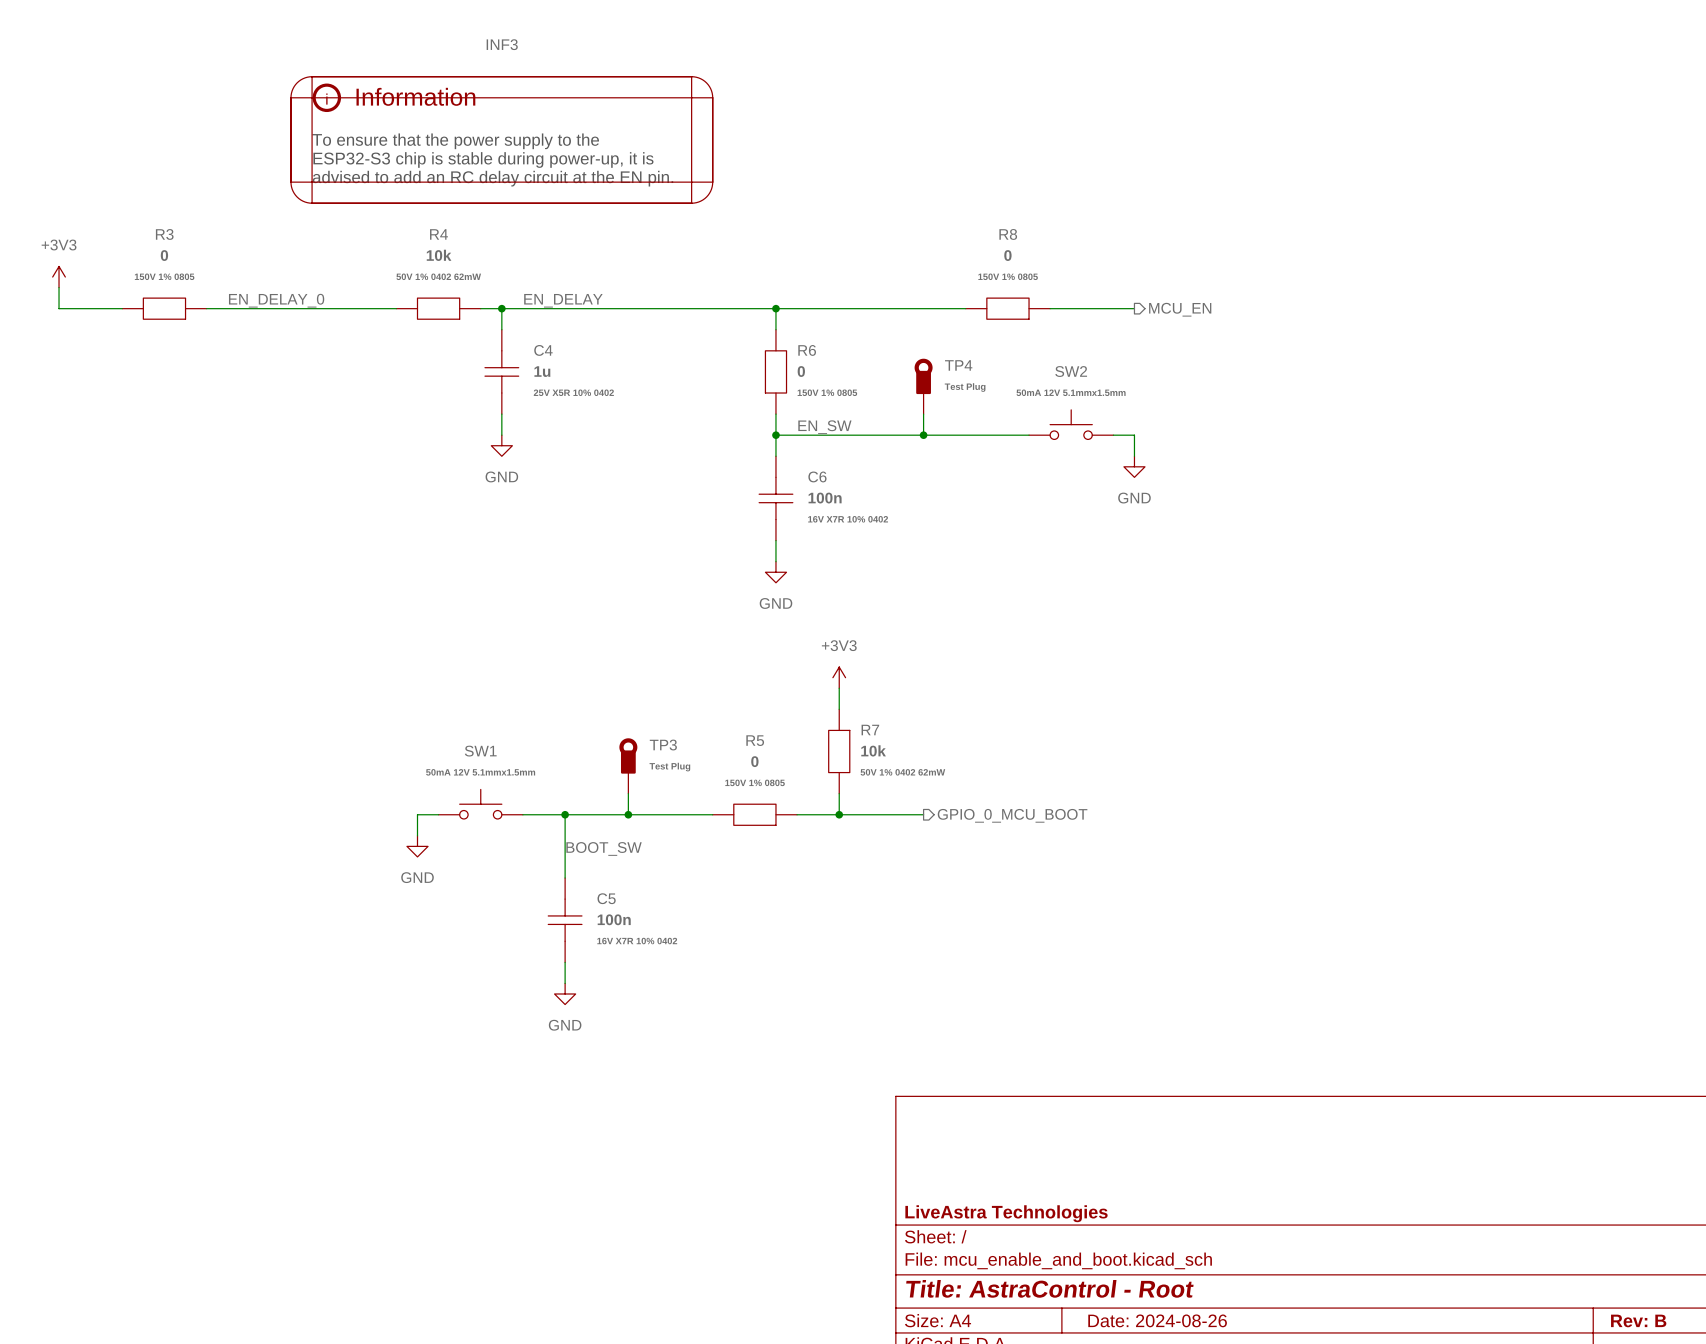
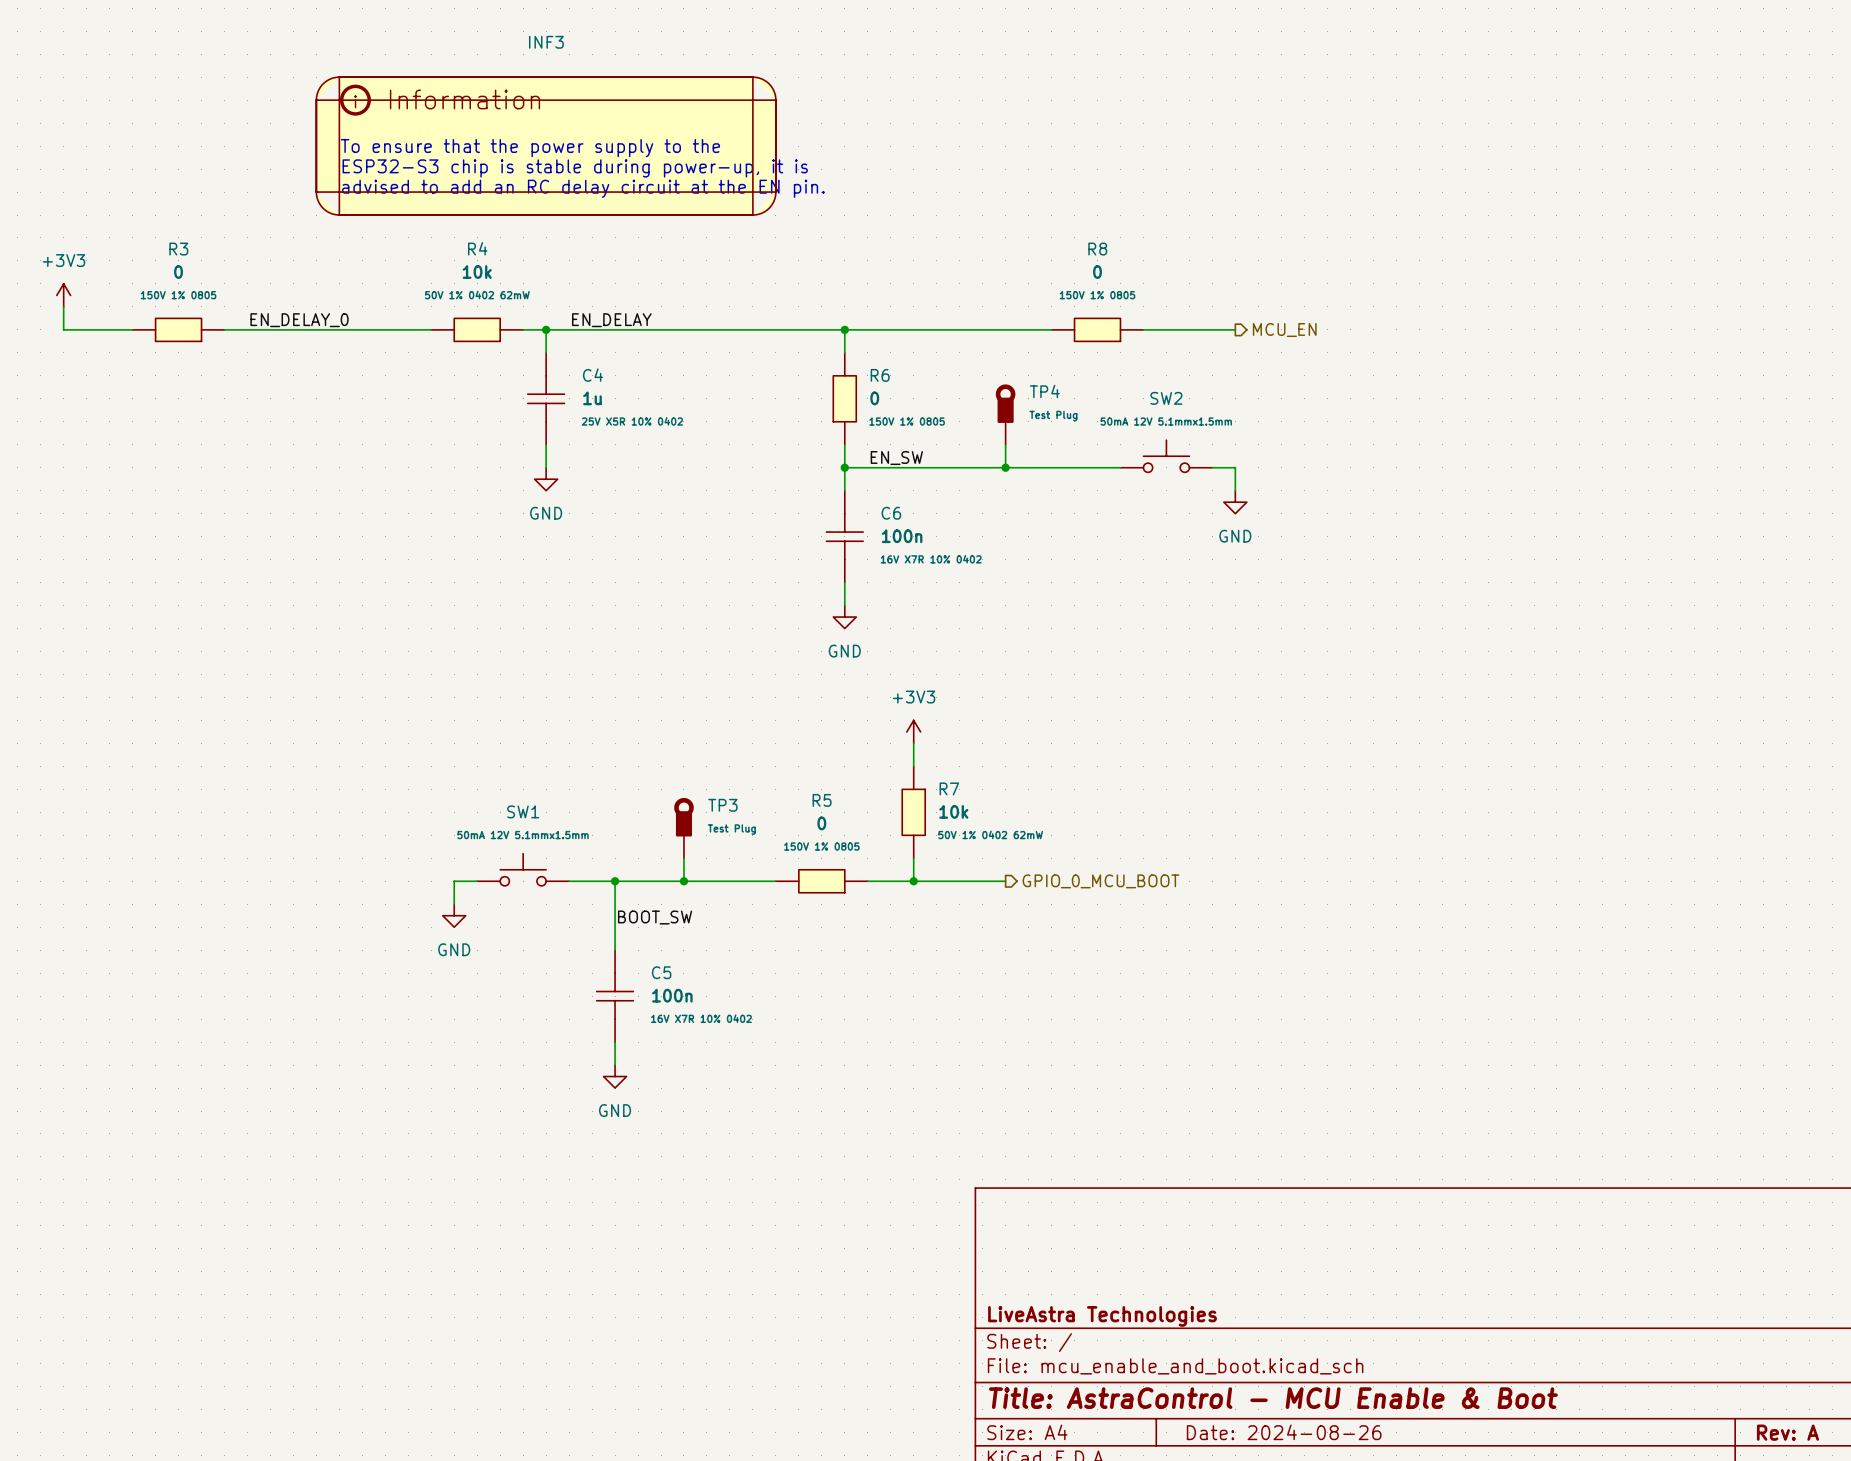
title block: Title: AstraControl - Root (1049, 1288) -> Title: AstraControl - MCU Enable & Boot (1273, 1398)
title block: Rev: B (1638, 1320) -> Rev: A (1787, 1432)

